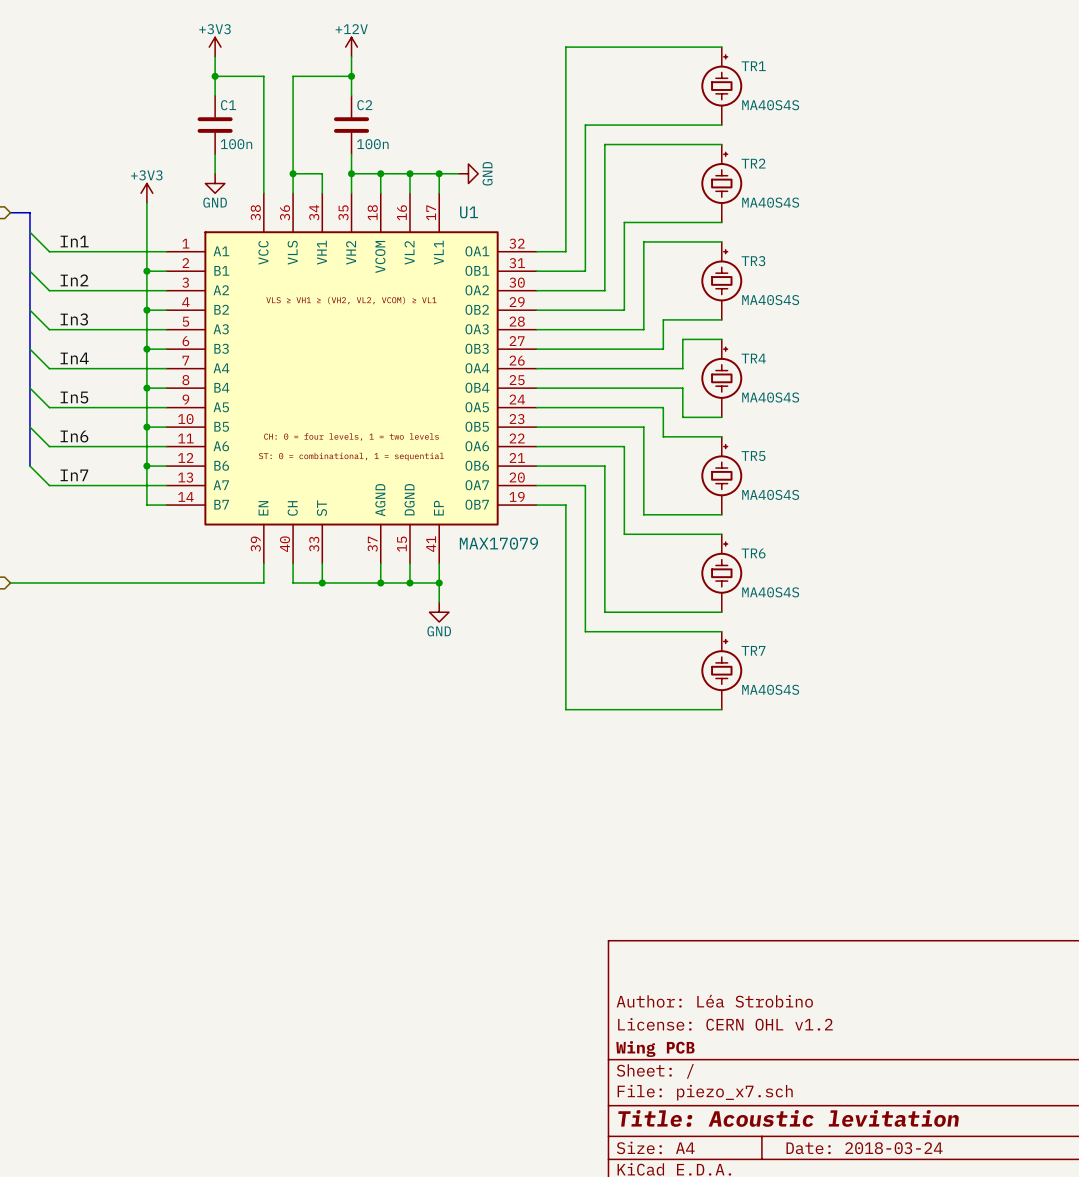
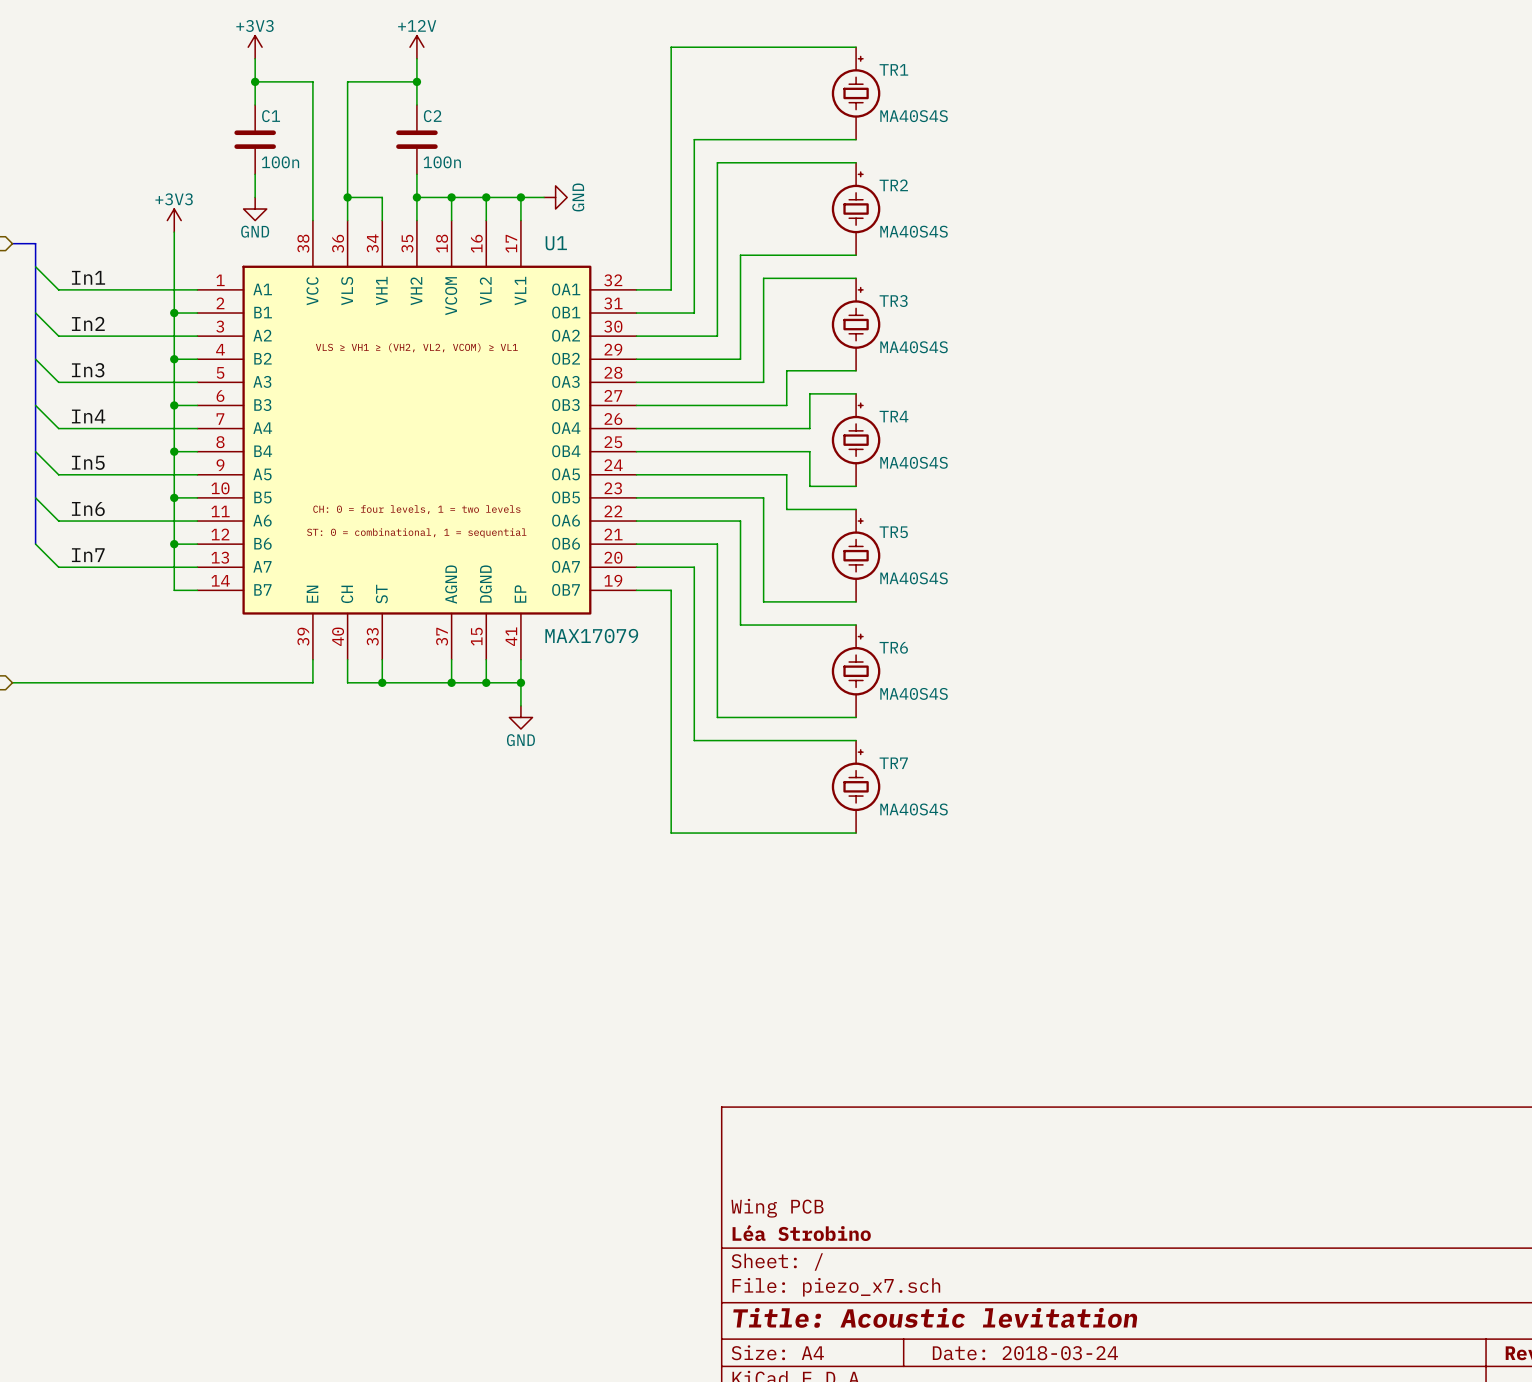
title block: Author: Léa Strobino (714, 1001) -> none
title block: License: CERN OHL v1.2 (725, 1024) -> Wing PCB (777, 1208)
title block: Wing PCB (655, 1049) -> Léa Strobino (801, 1233)

